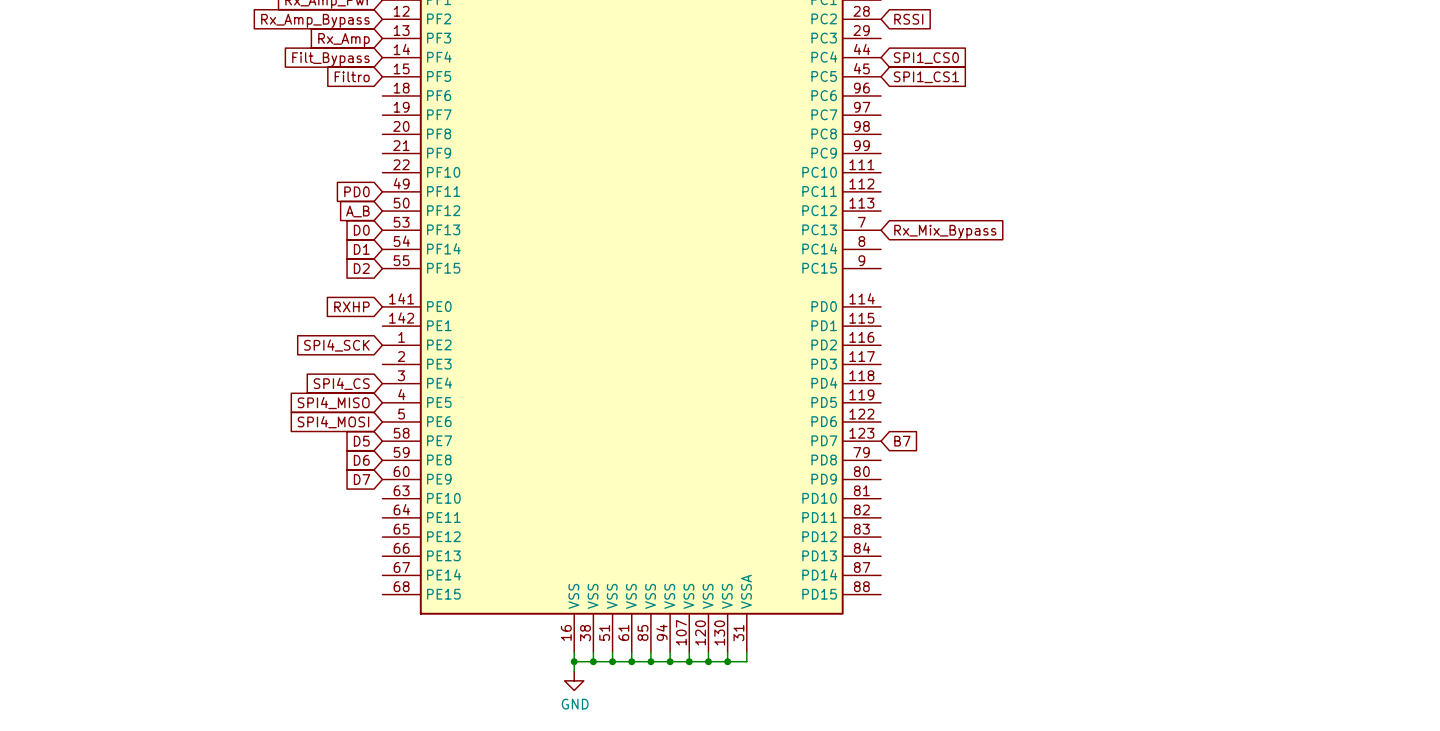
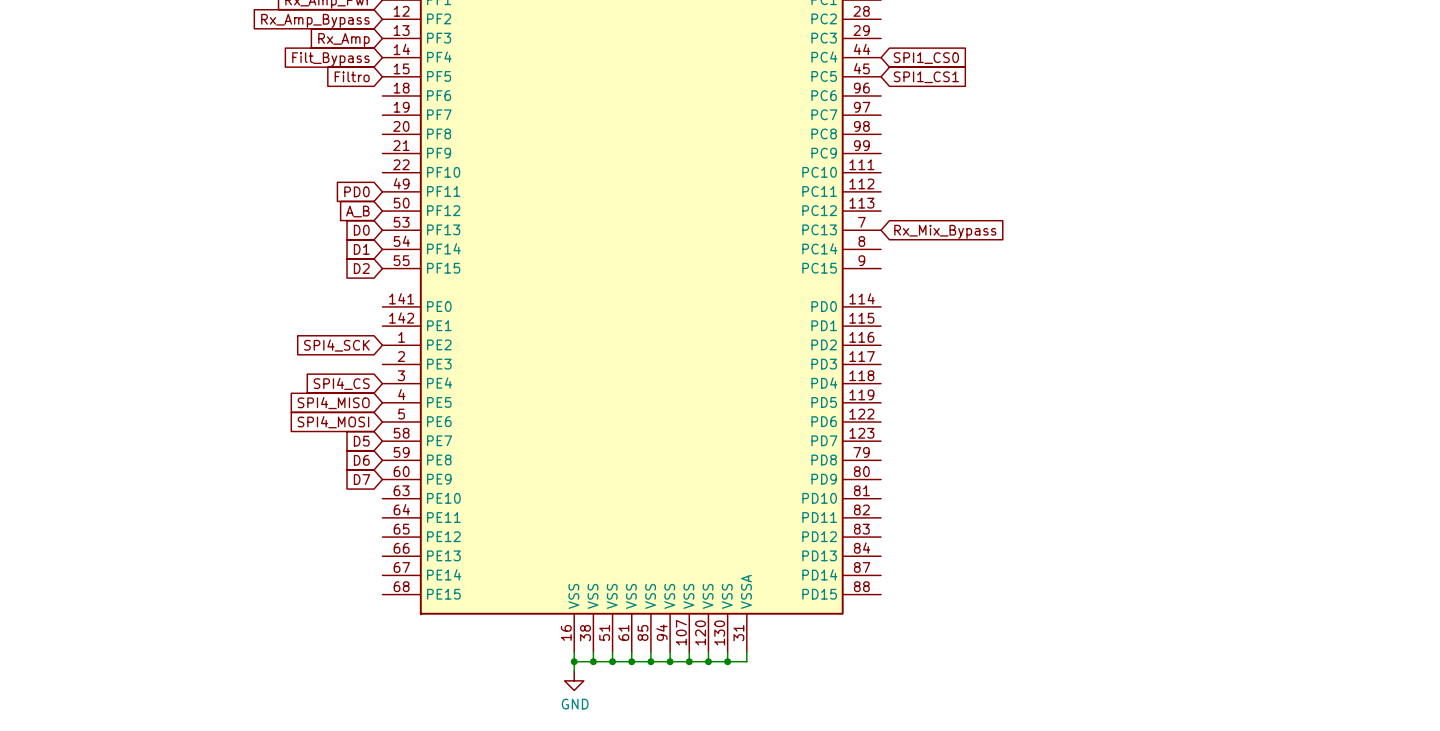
global label: RSSI (908, 19) -> none
global label: RXHP (351, 306) -> none
global label: B7 (902, 441) -> none

